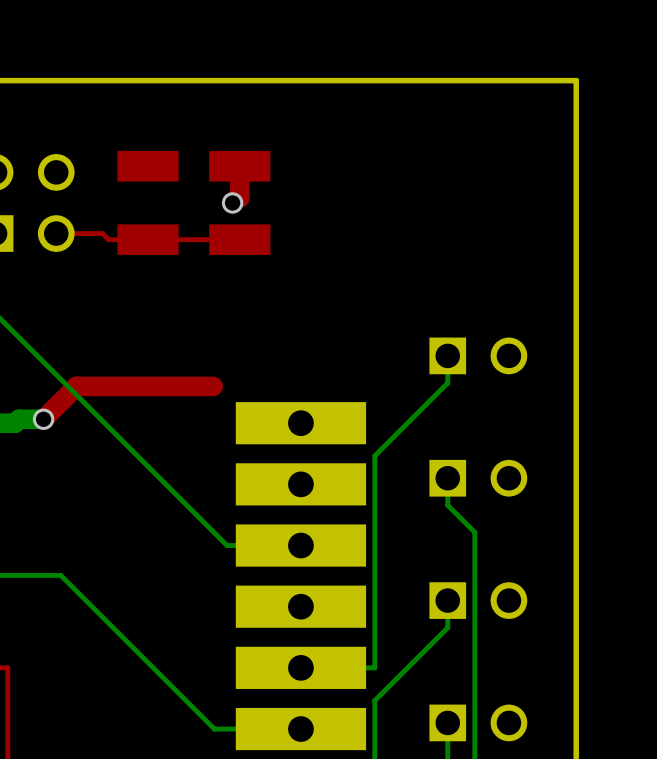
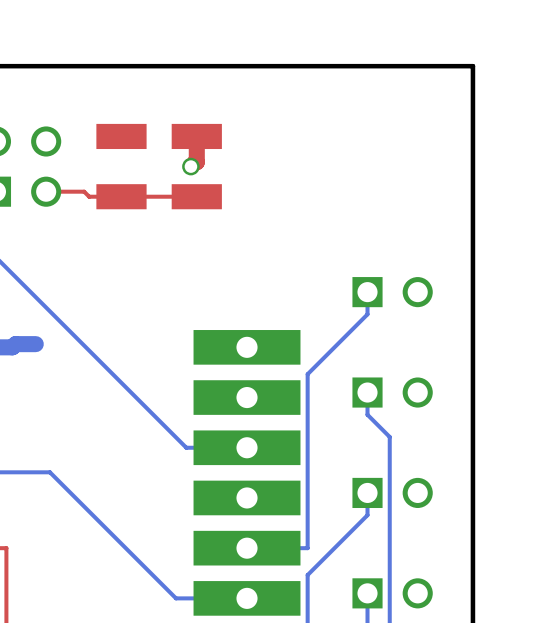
top track: (213, 386) (76, 386) (43, 419) -> none
via: (43, 419) -> none

